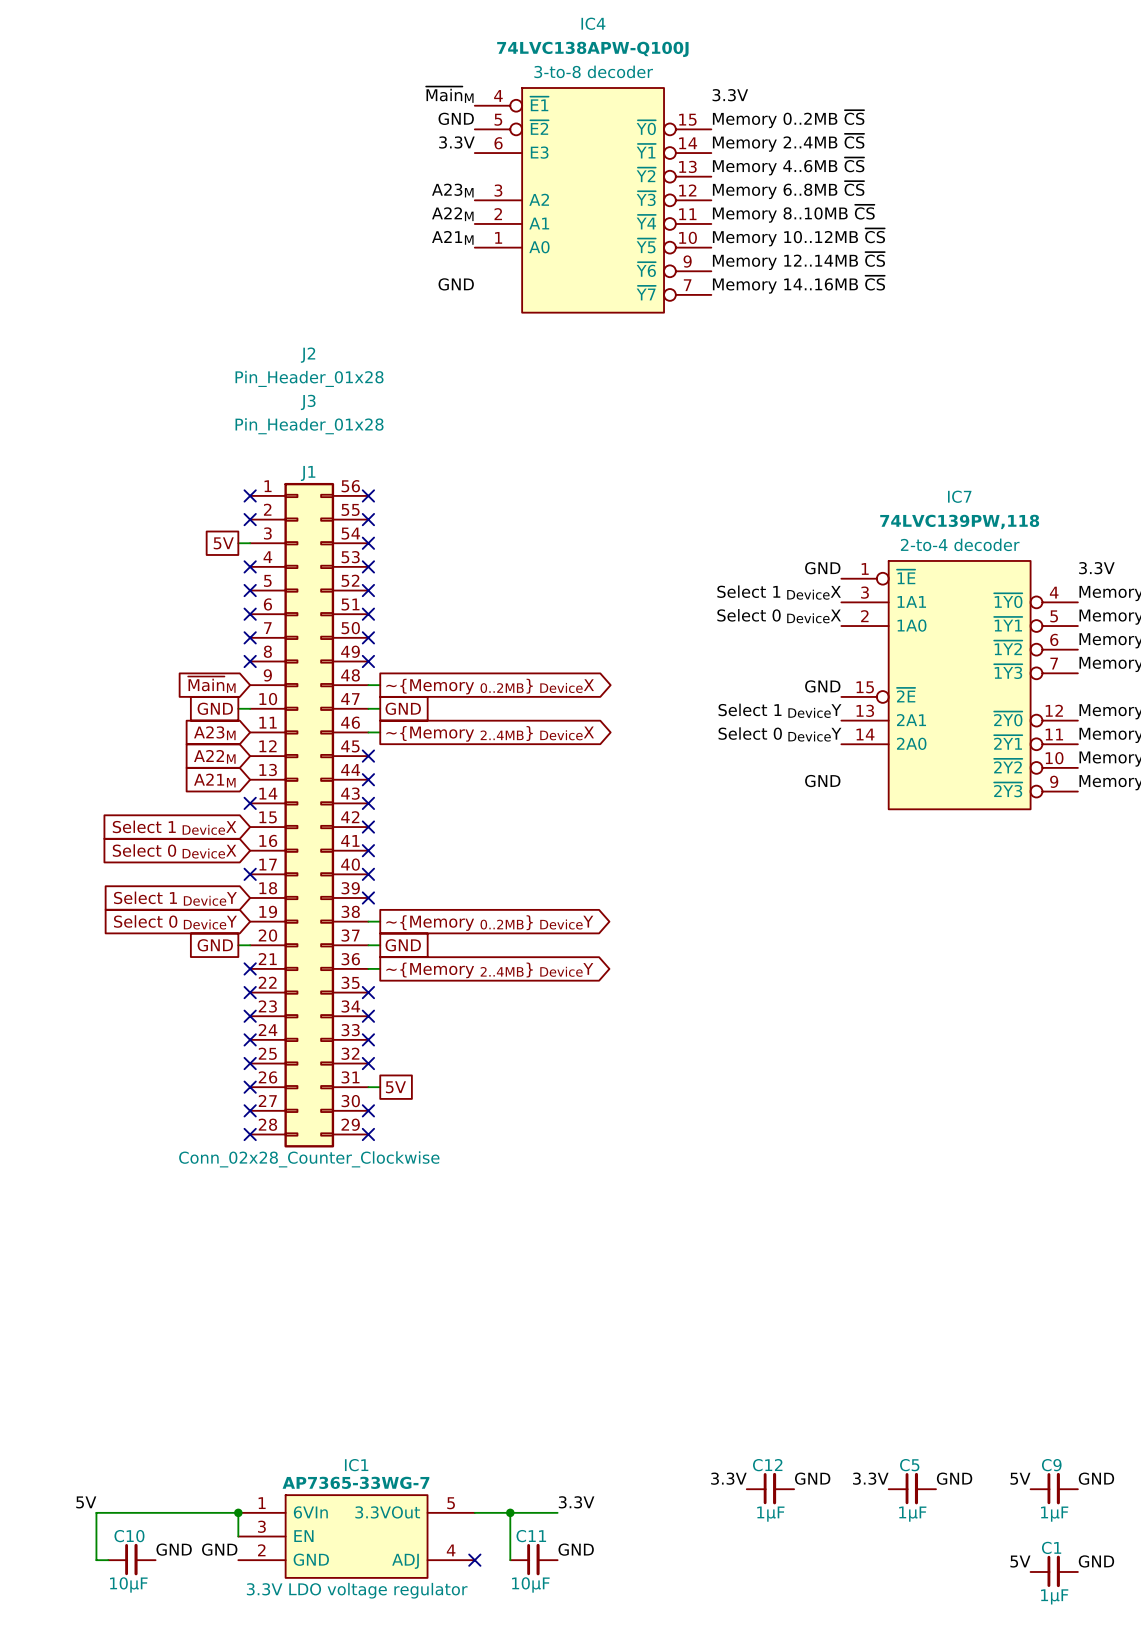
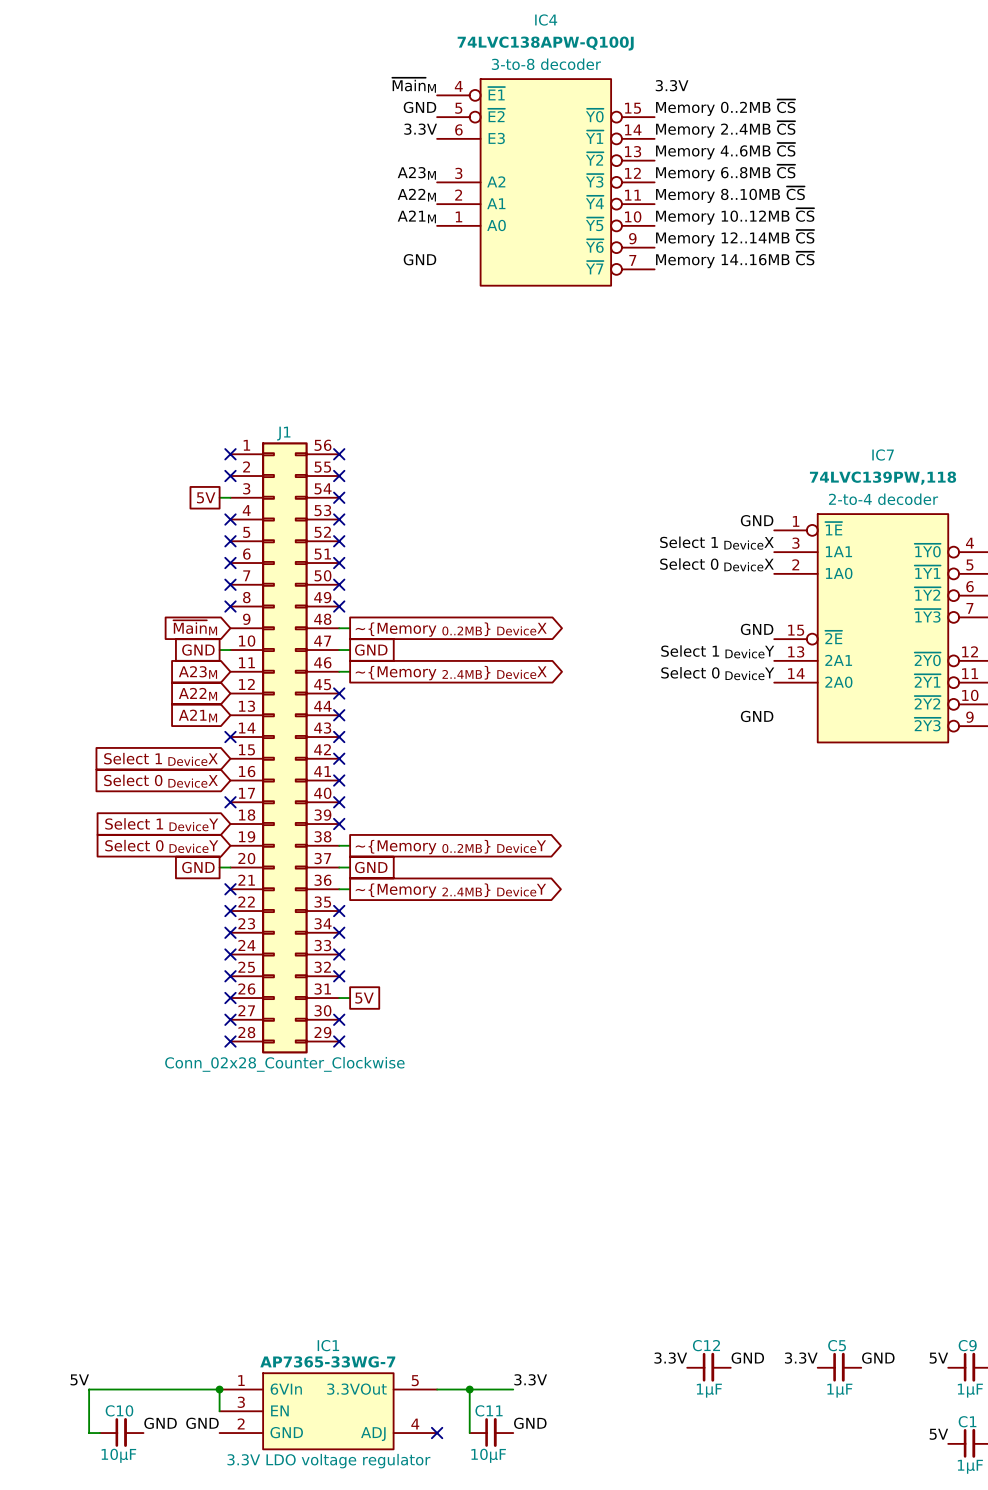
J2: Pin_Header_01x28 (309, 367) -> none
J3: Pin_Header_01x28 (309, 414) -> none

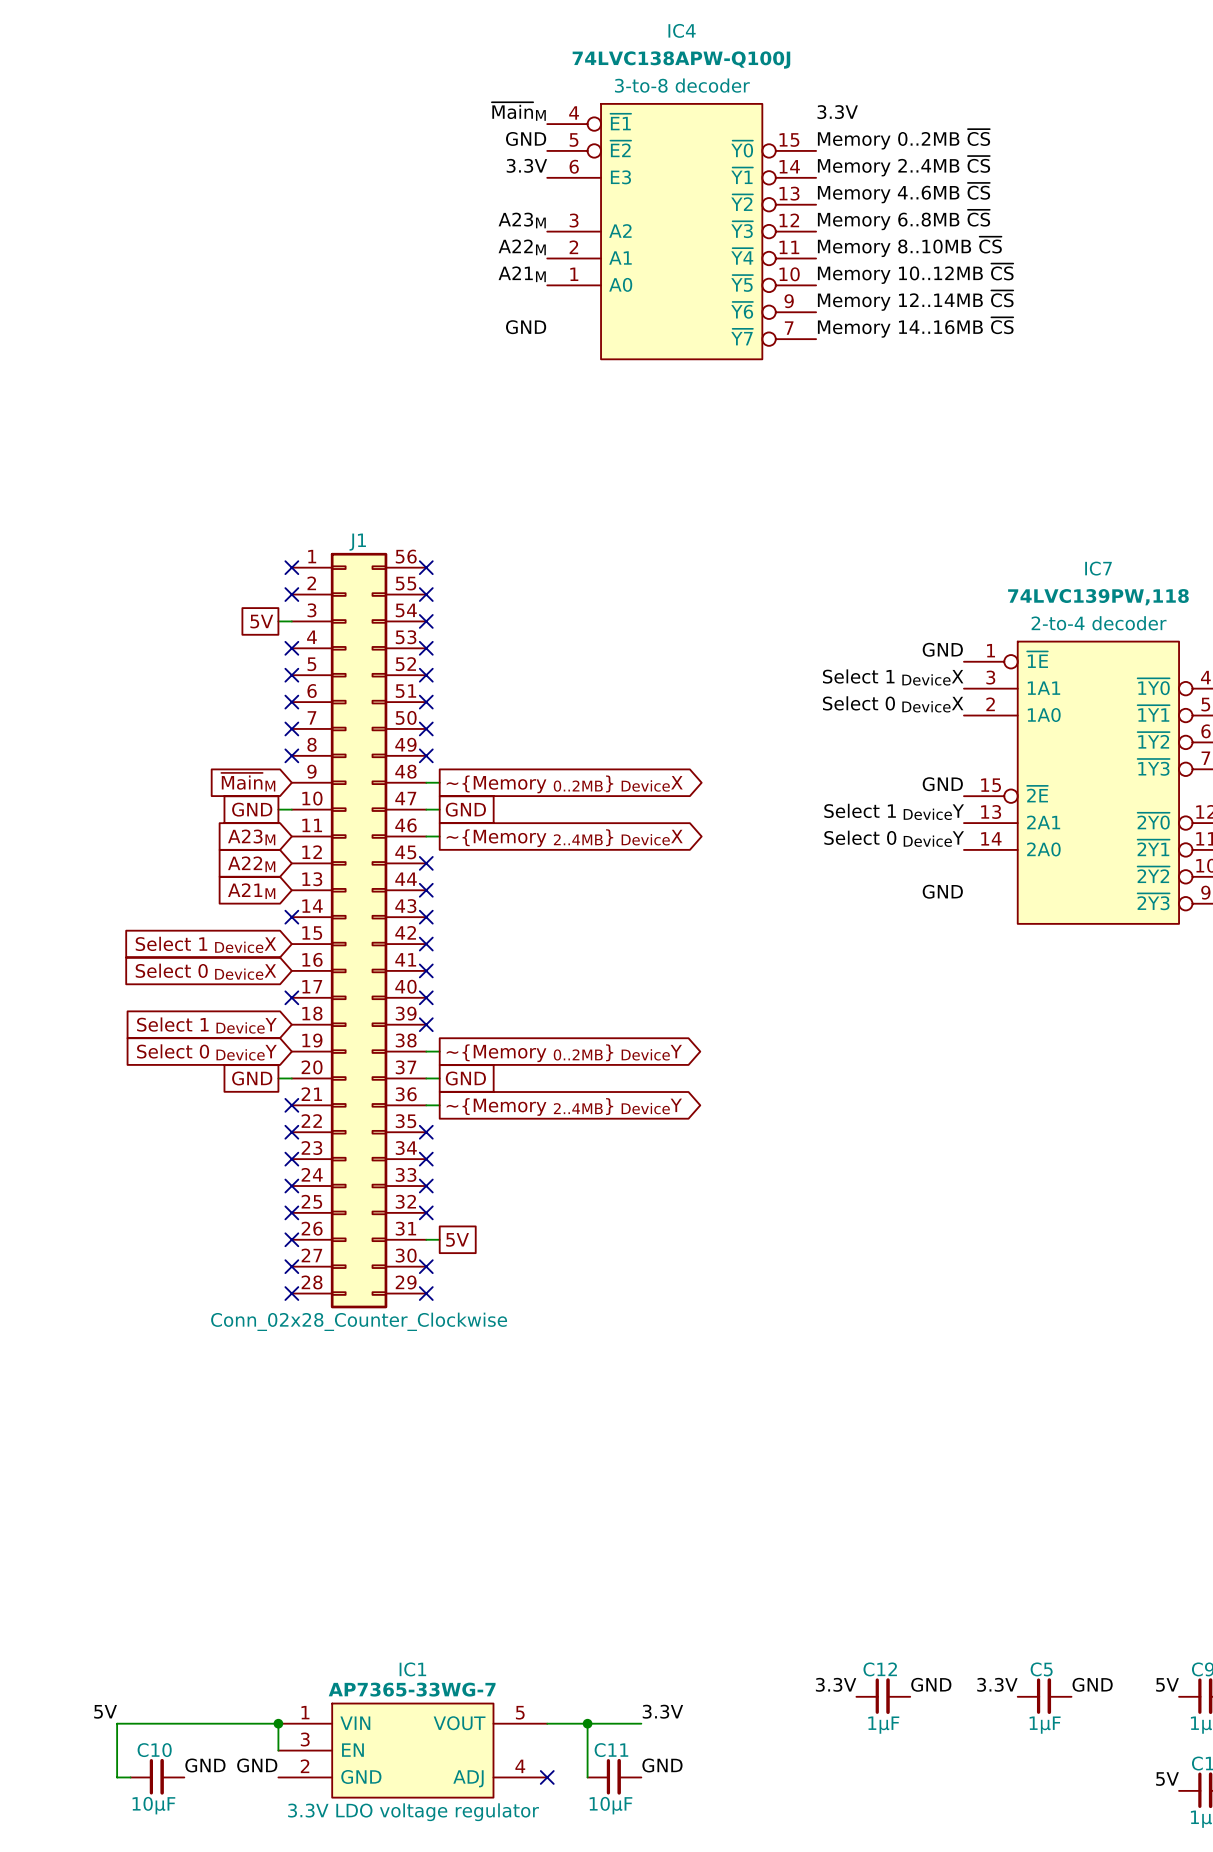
IC1 pin name: 6VIn (286, 1389) -> VIN (355, 1723)
IC1 pin name: 3.3VOut (356, 1389) -> VOUT (459, 1723)

